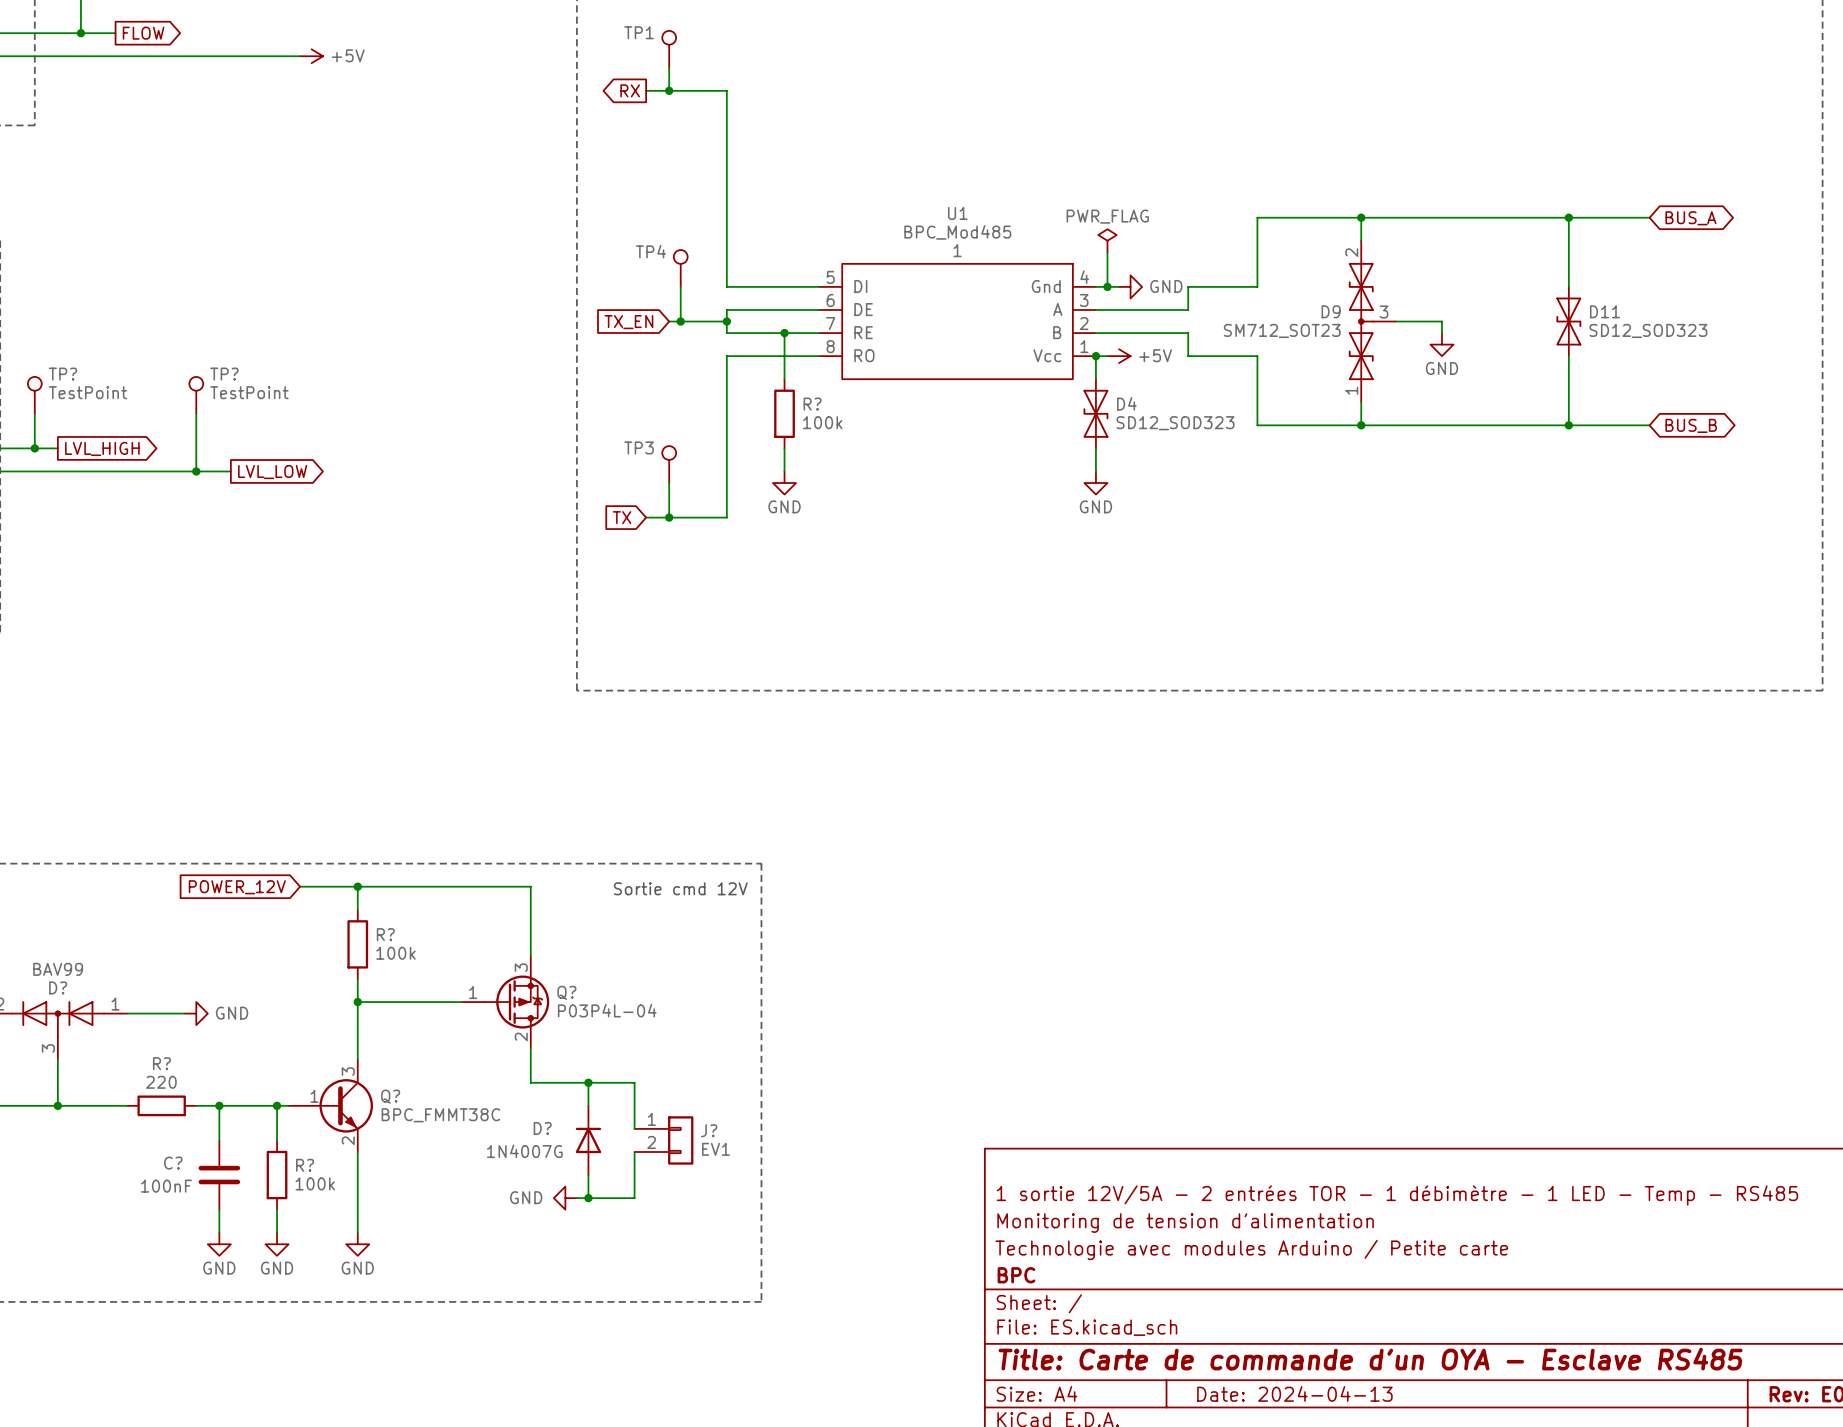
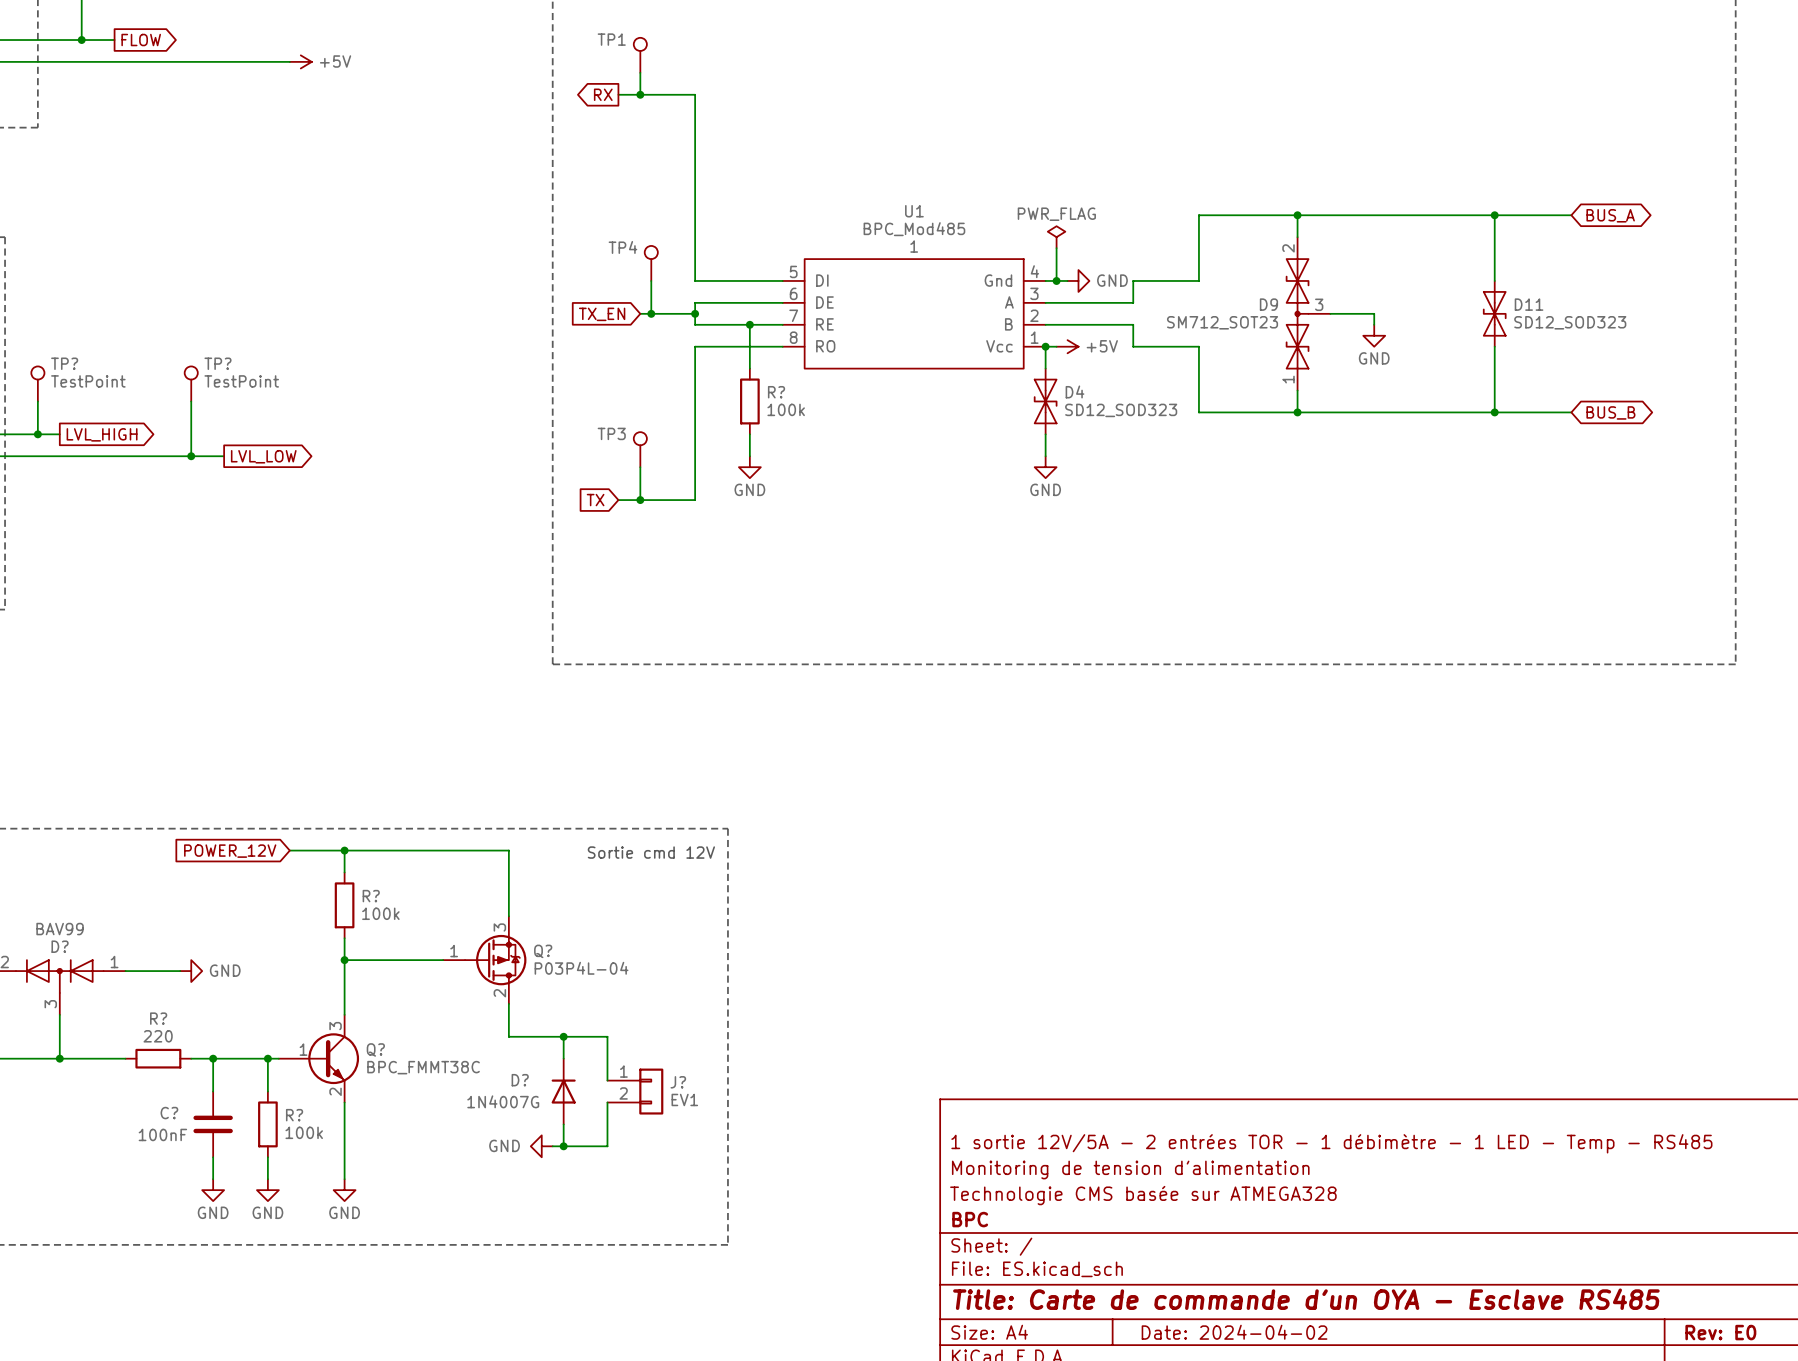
title block: Technologie avec modules Arduino / Petite carte (1251, 1249) -> Technologie CMS basée sur ATMEGA328 (1143, 1195)
title block: Date: 2024-04-13 (1294, 1393) -> Date: 2024-04-02 (1234, 1332)

